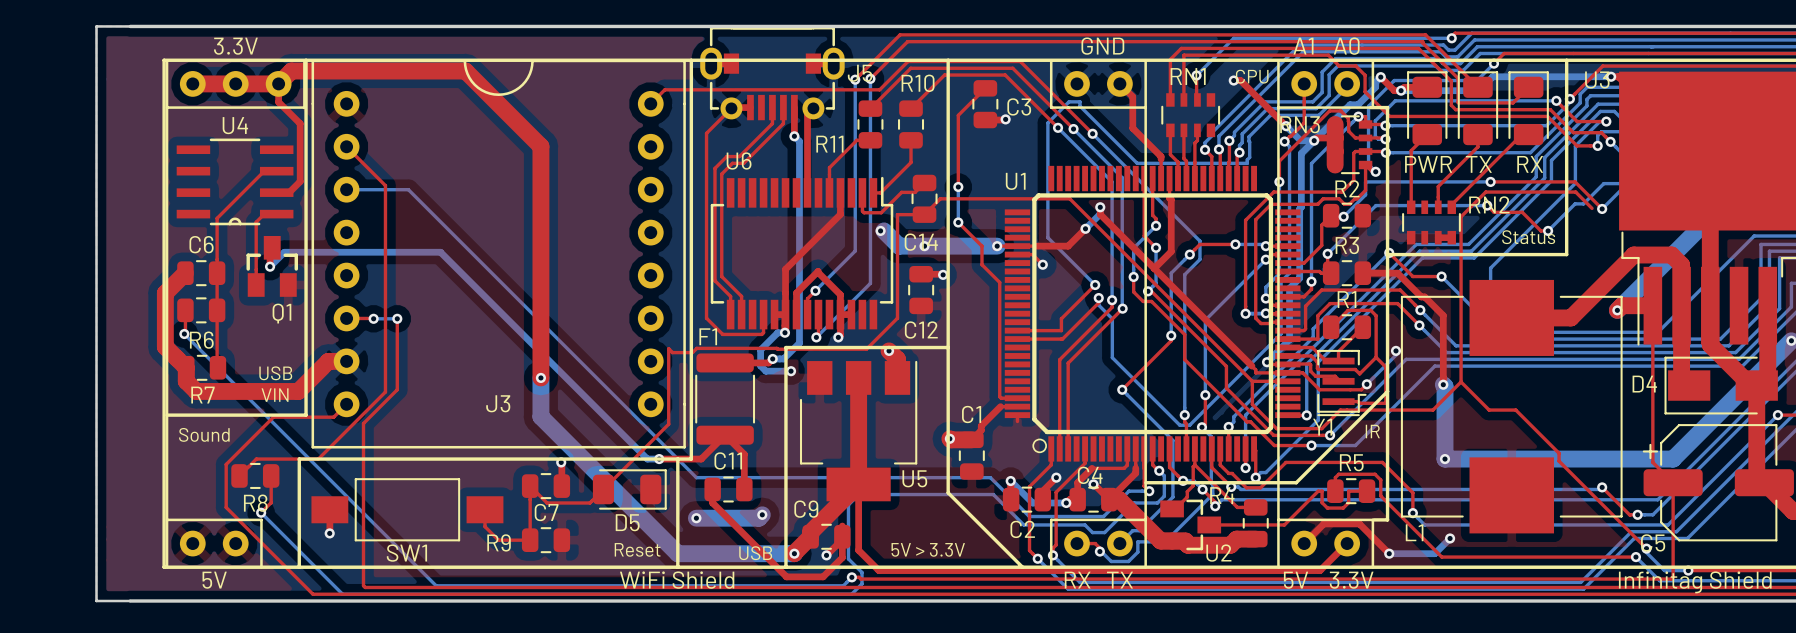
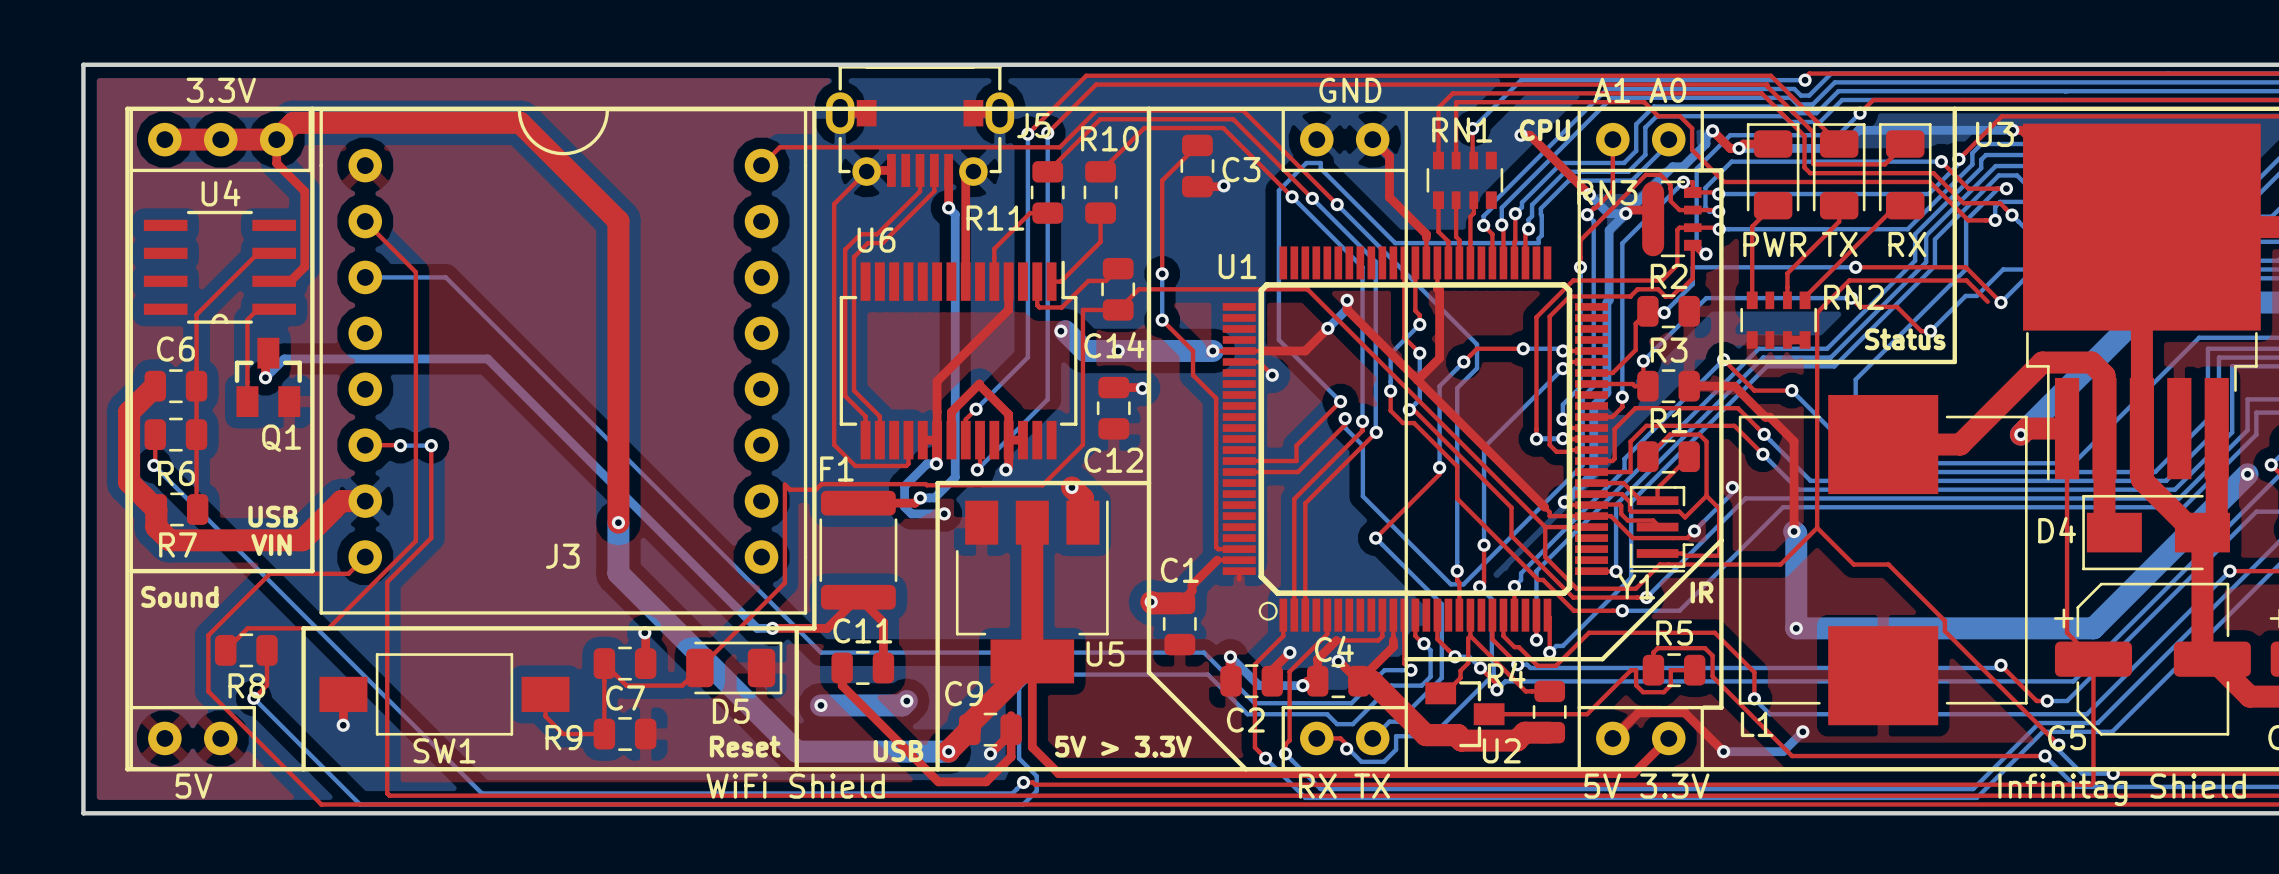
board edge: (130, 26) (96, 26) (96, 601) (130, 601) -> (83, 64) (83, 813)

